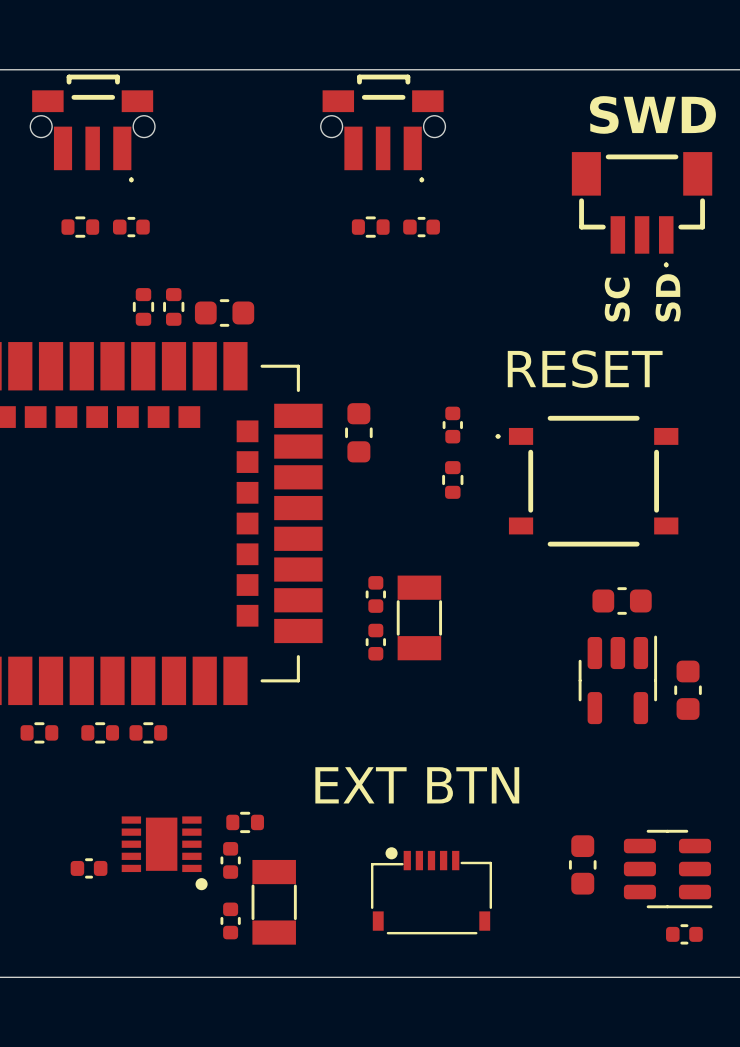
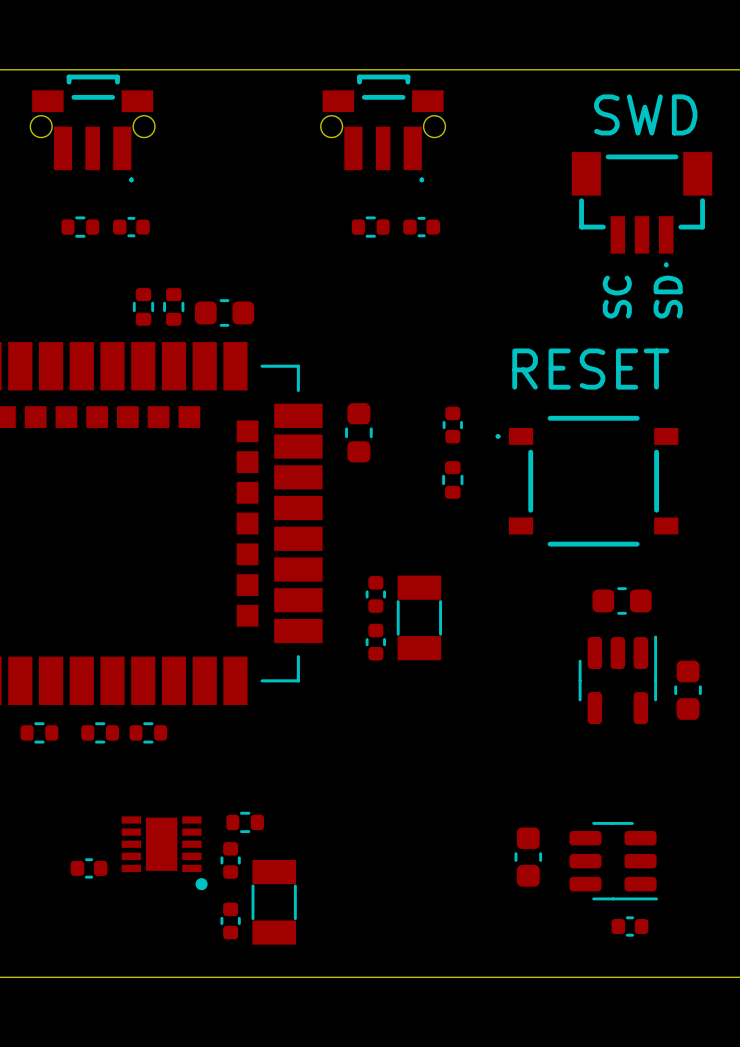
text: EXT BTN (417, 785) -> none
part position: (582, 864) -> (528, 857)
part position: (668, 869) -> (613, 861)
part: (431, 890) -> none
part position: (684, 934) -> (629, 926)

